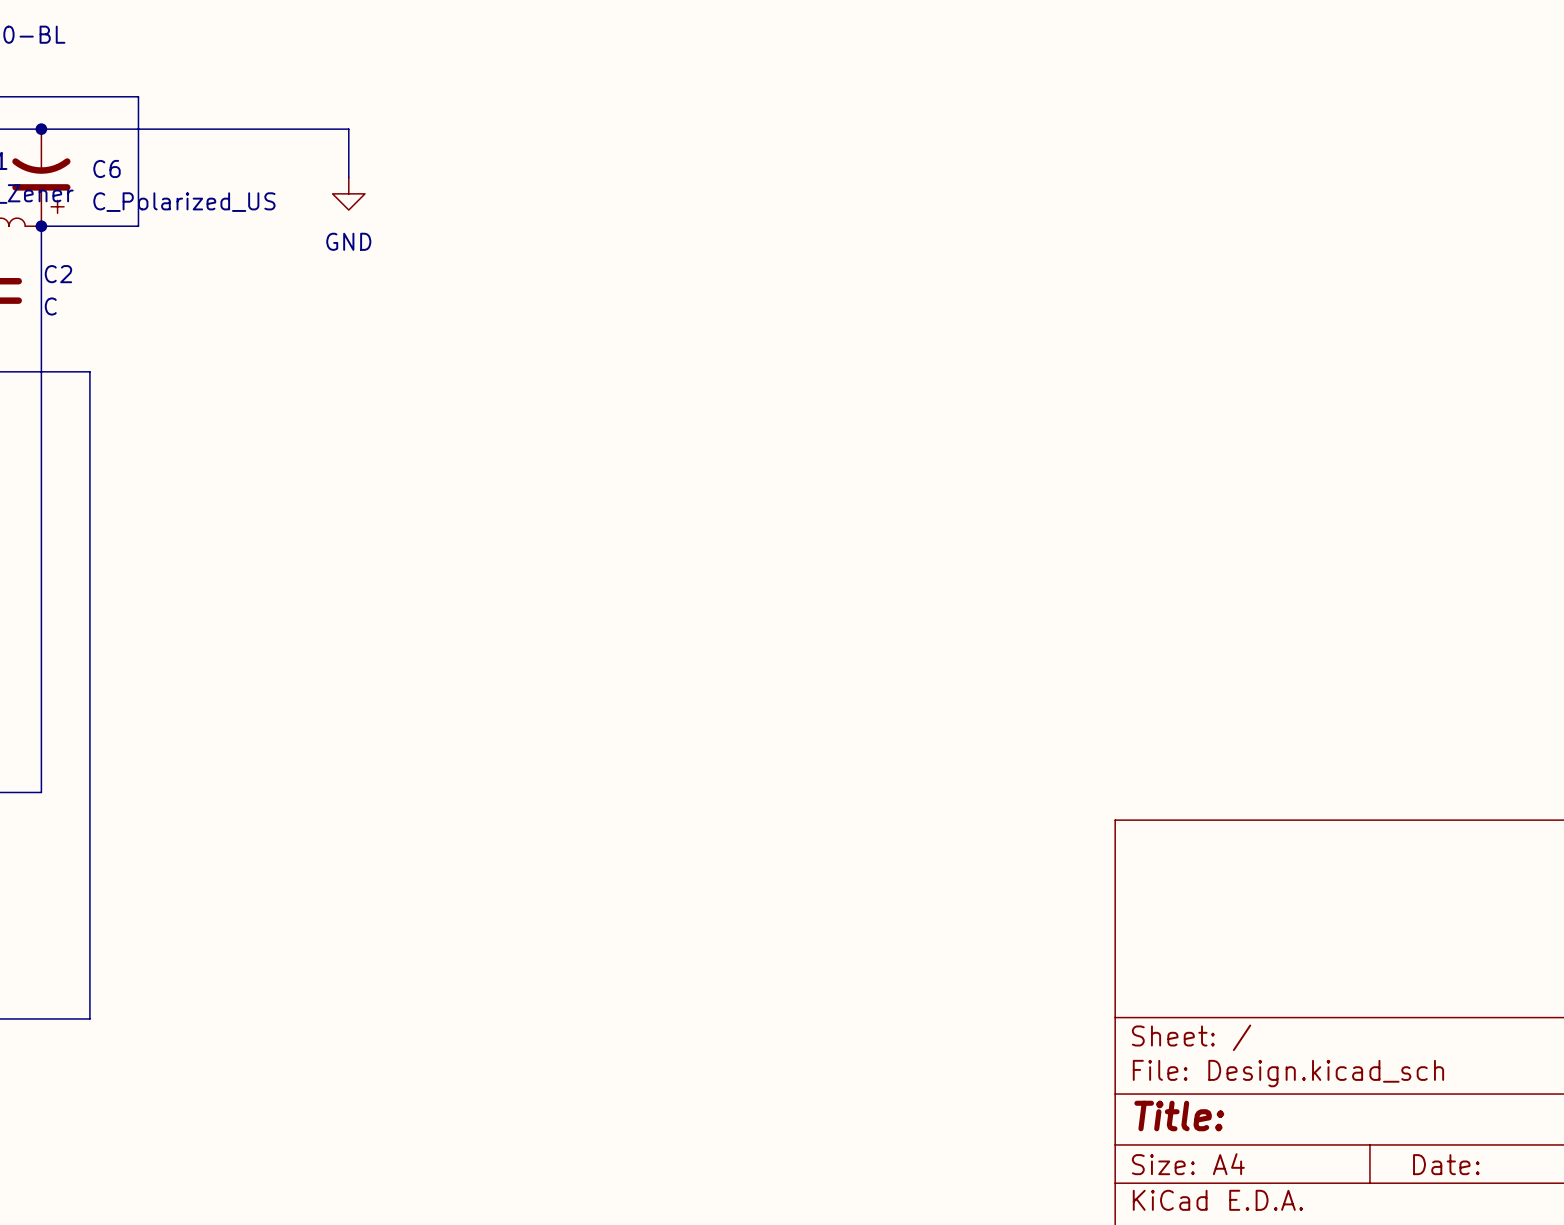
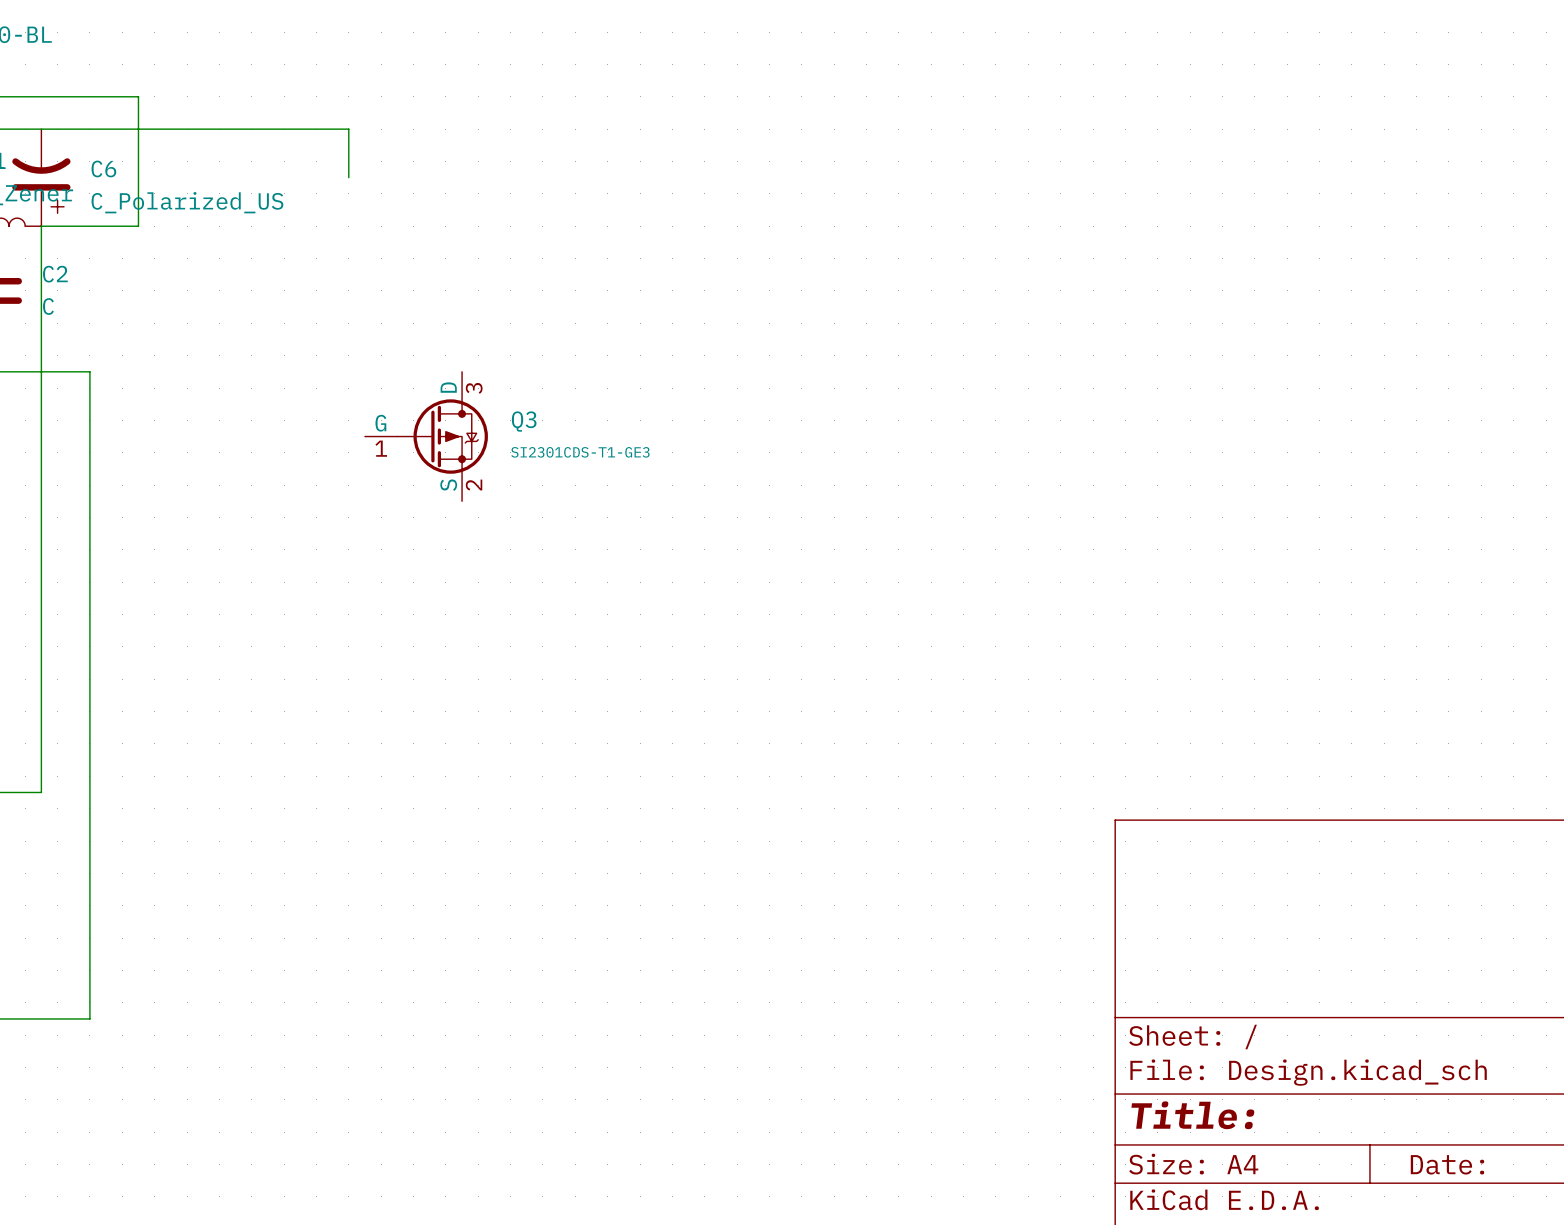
junction: (41, 129) -> none
power symbol: GND (348, 193) -> none
junction: (41, 226) -> none
Q3: none -> SI2301CDS-T1-GE3 (426, 436)

